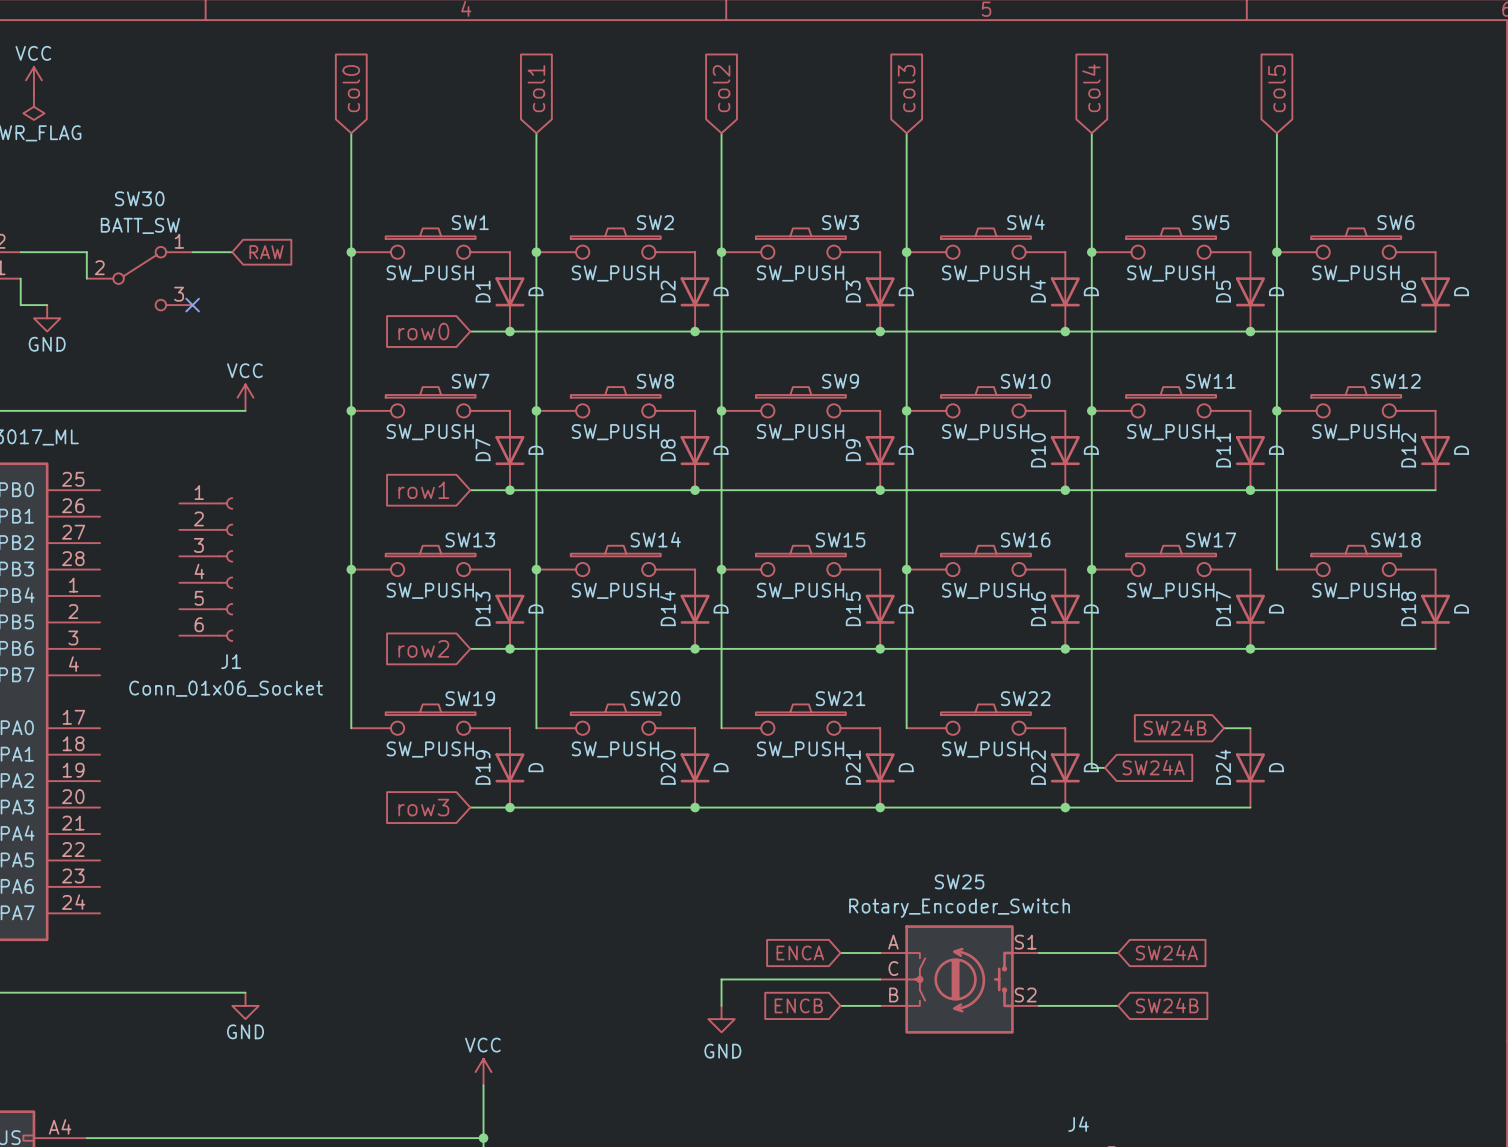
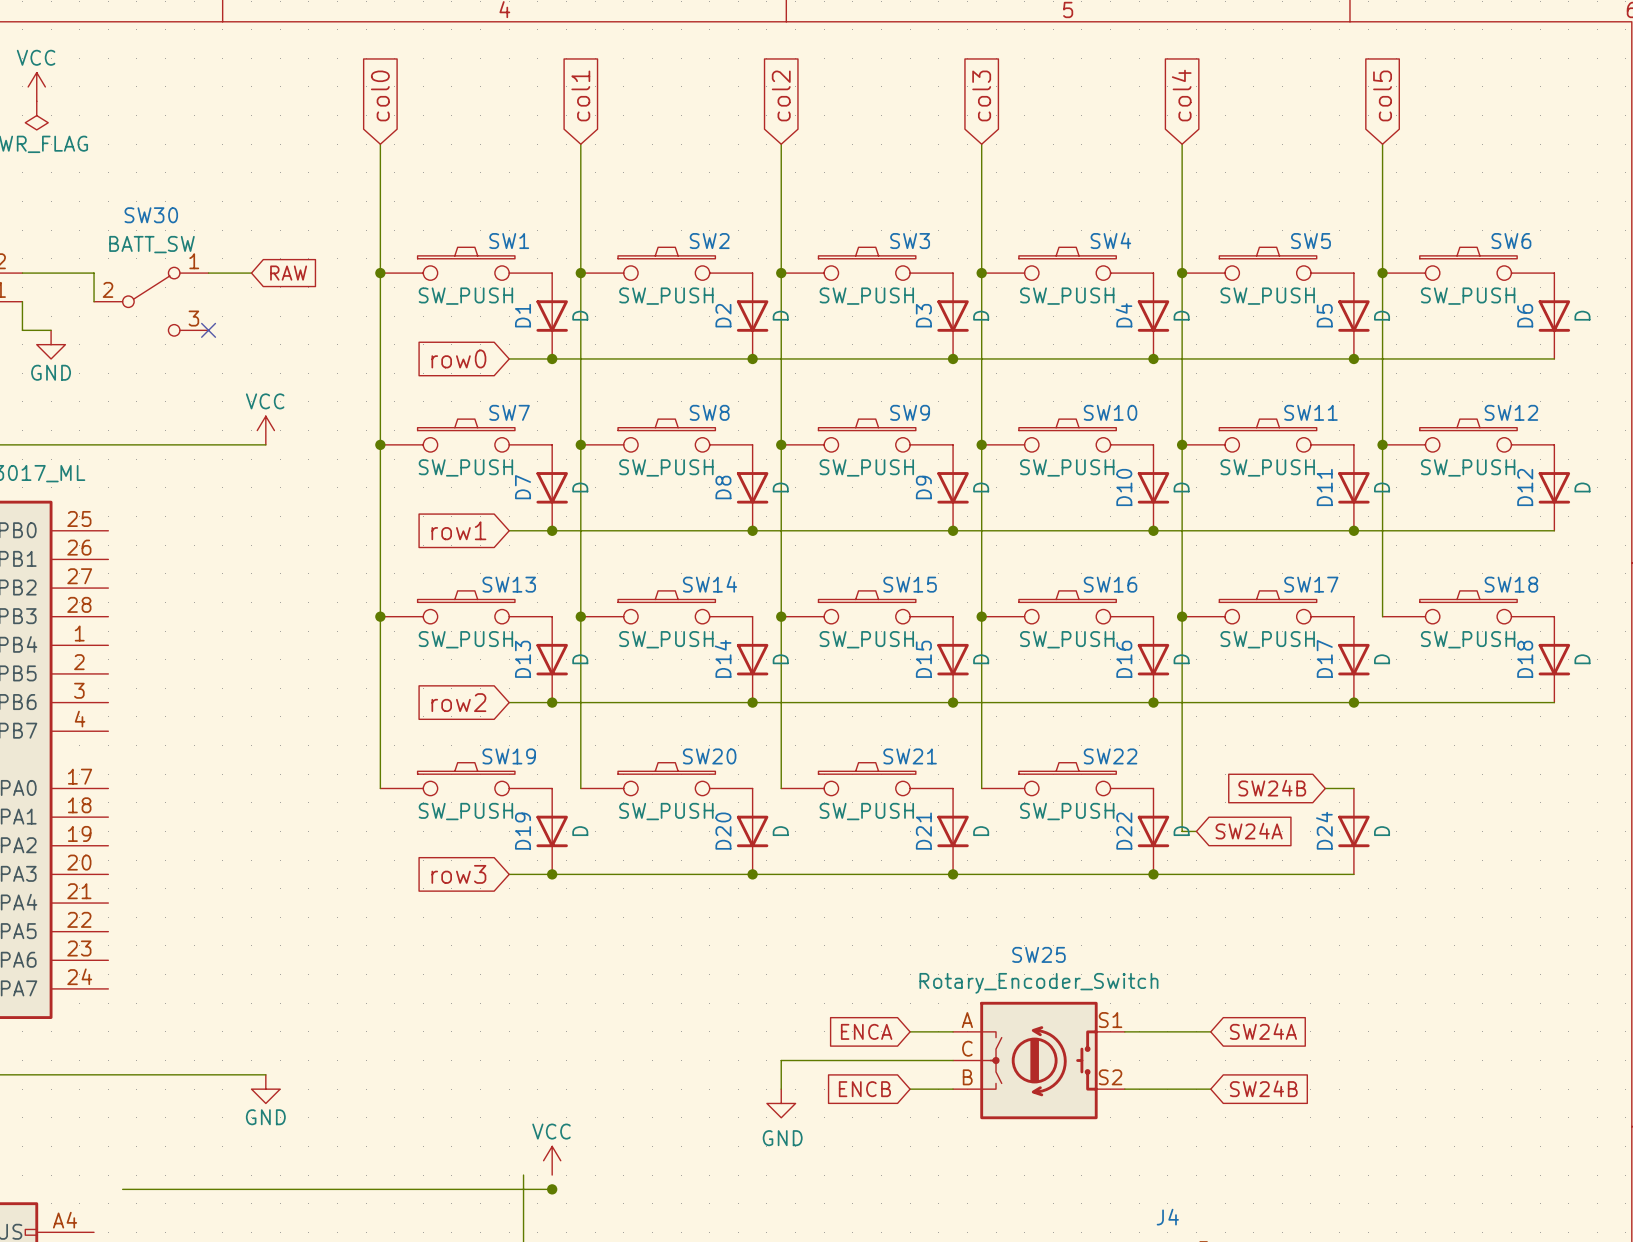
J1: Conn_01x06_Socket (206, 569) -> none
power symbol position: VCC (483, 1072) -> VCC (552, 1160)
junction: none -> (552, 1189)
wire: (86, 1138) (483, 1138) -> (122, 1189) (552, 1189)
junction: (483, 1138) -> none

